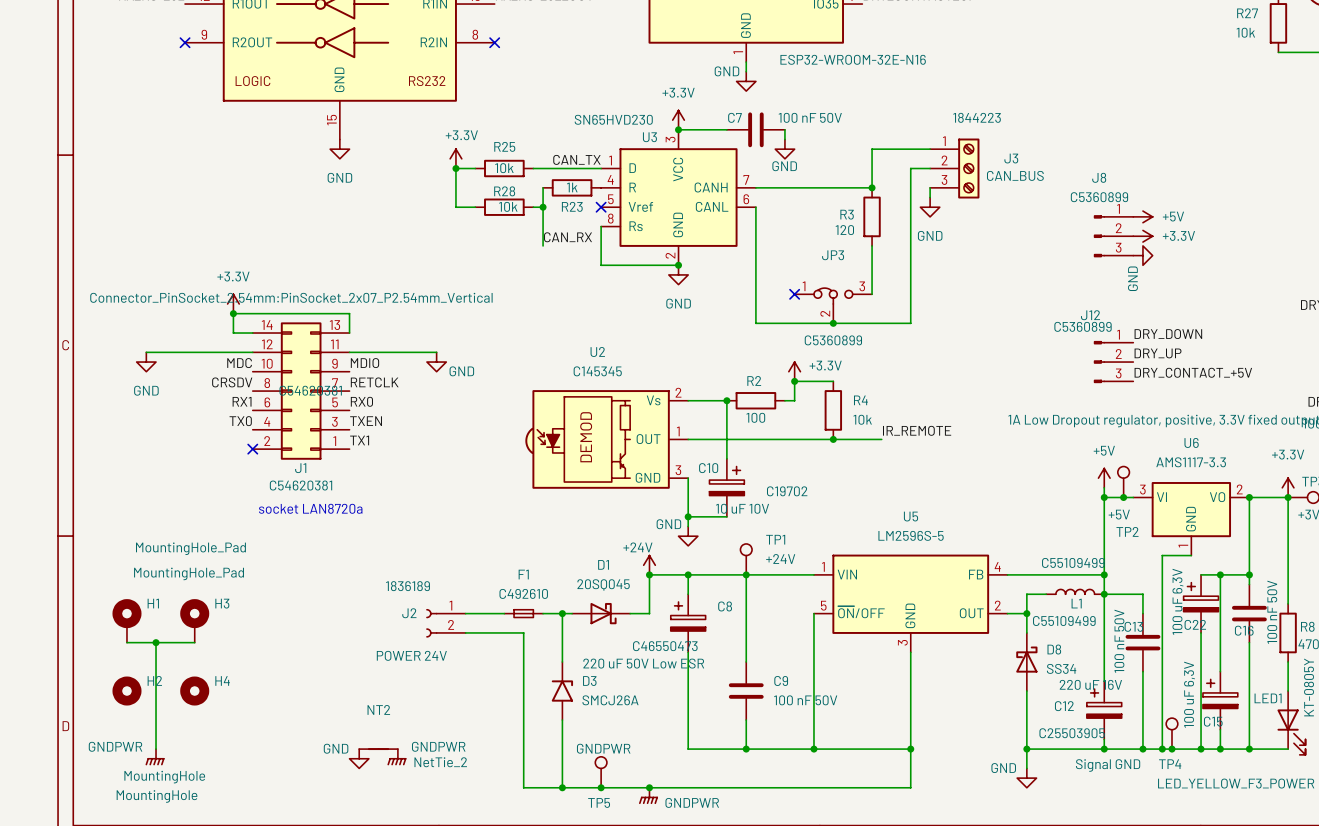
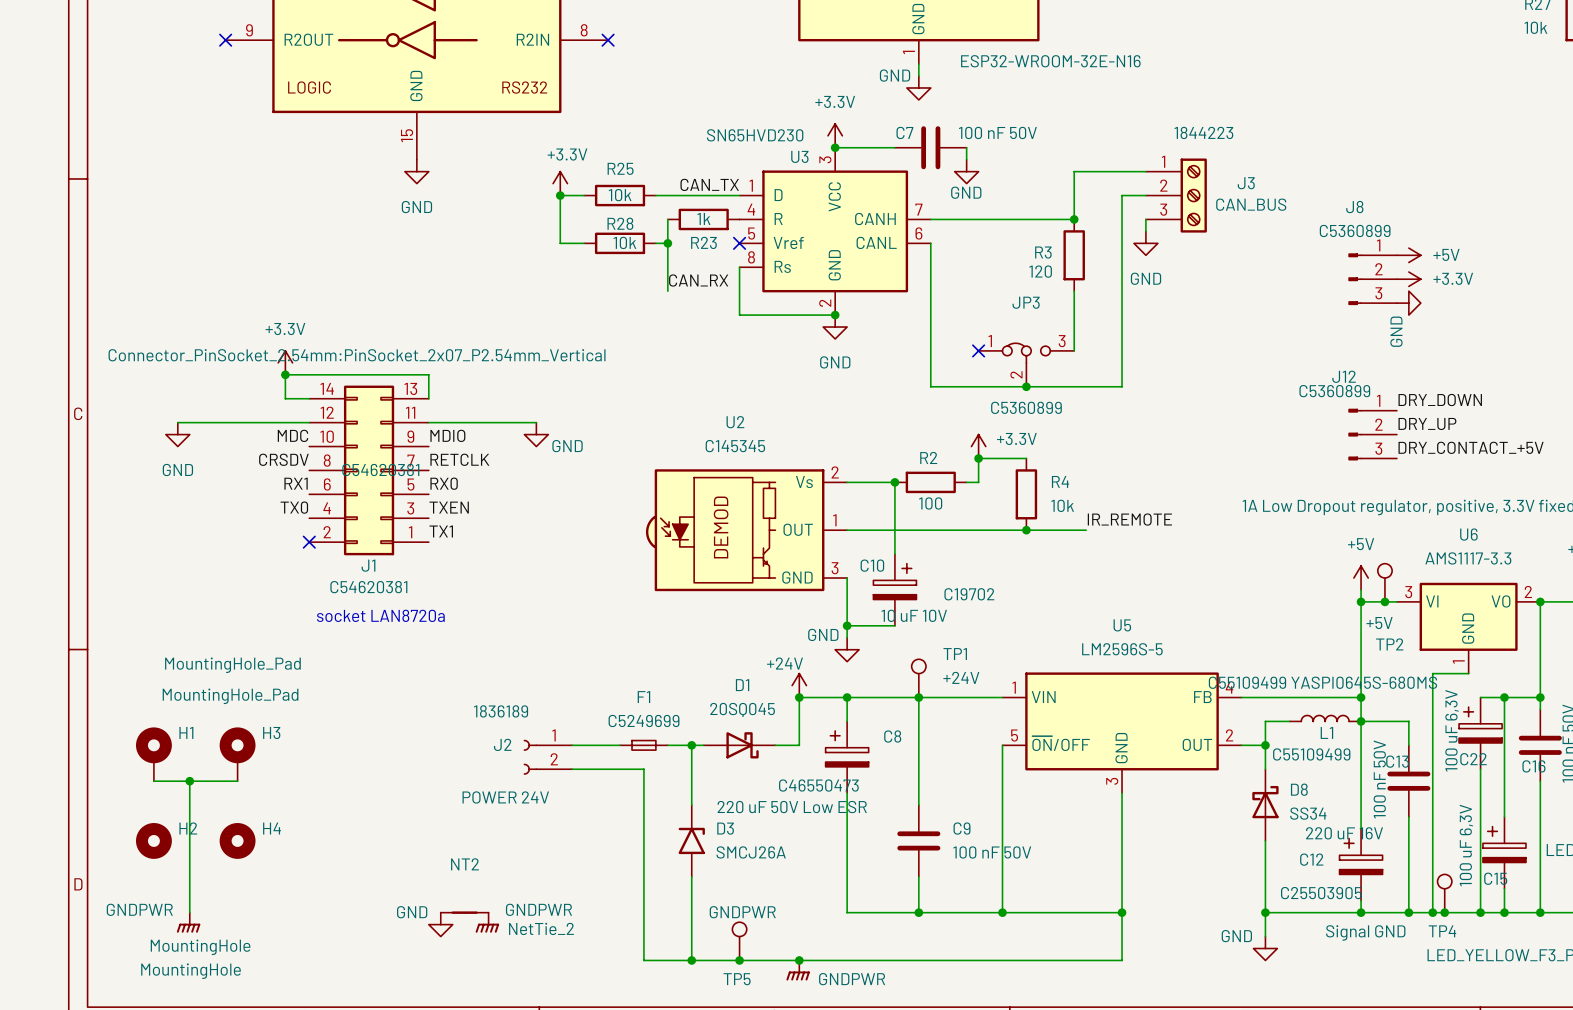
L1 text: C55109499 (1073, 562) -> C55109499 YASPI0645S-680MS (1322, 682)
F1 value: C492610 (523, 593) -> C5249699 (644, 720)

